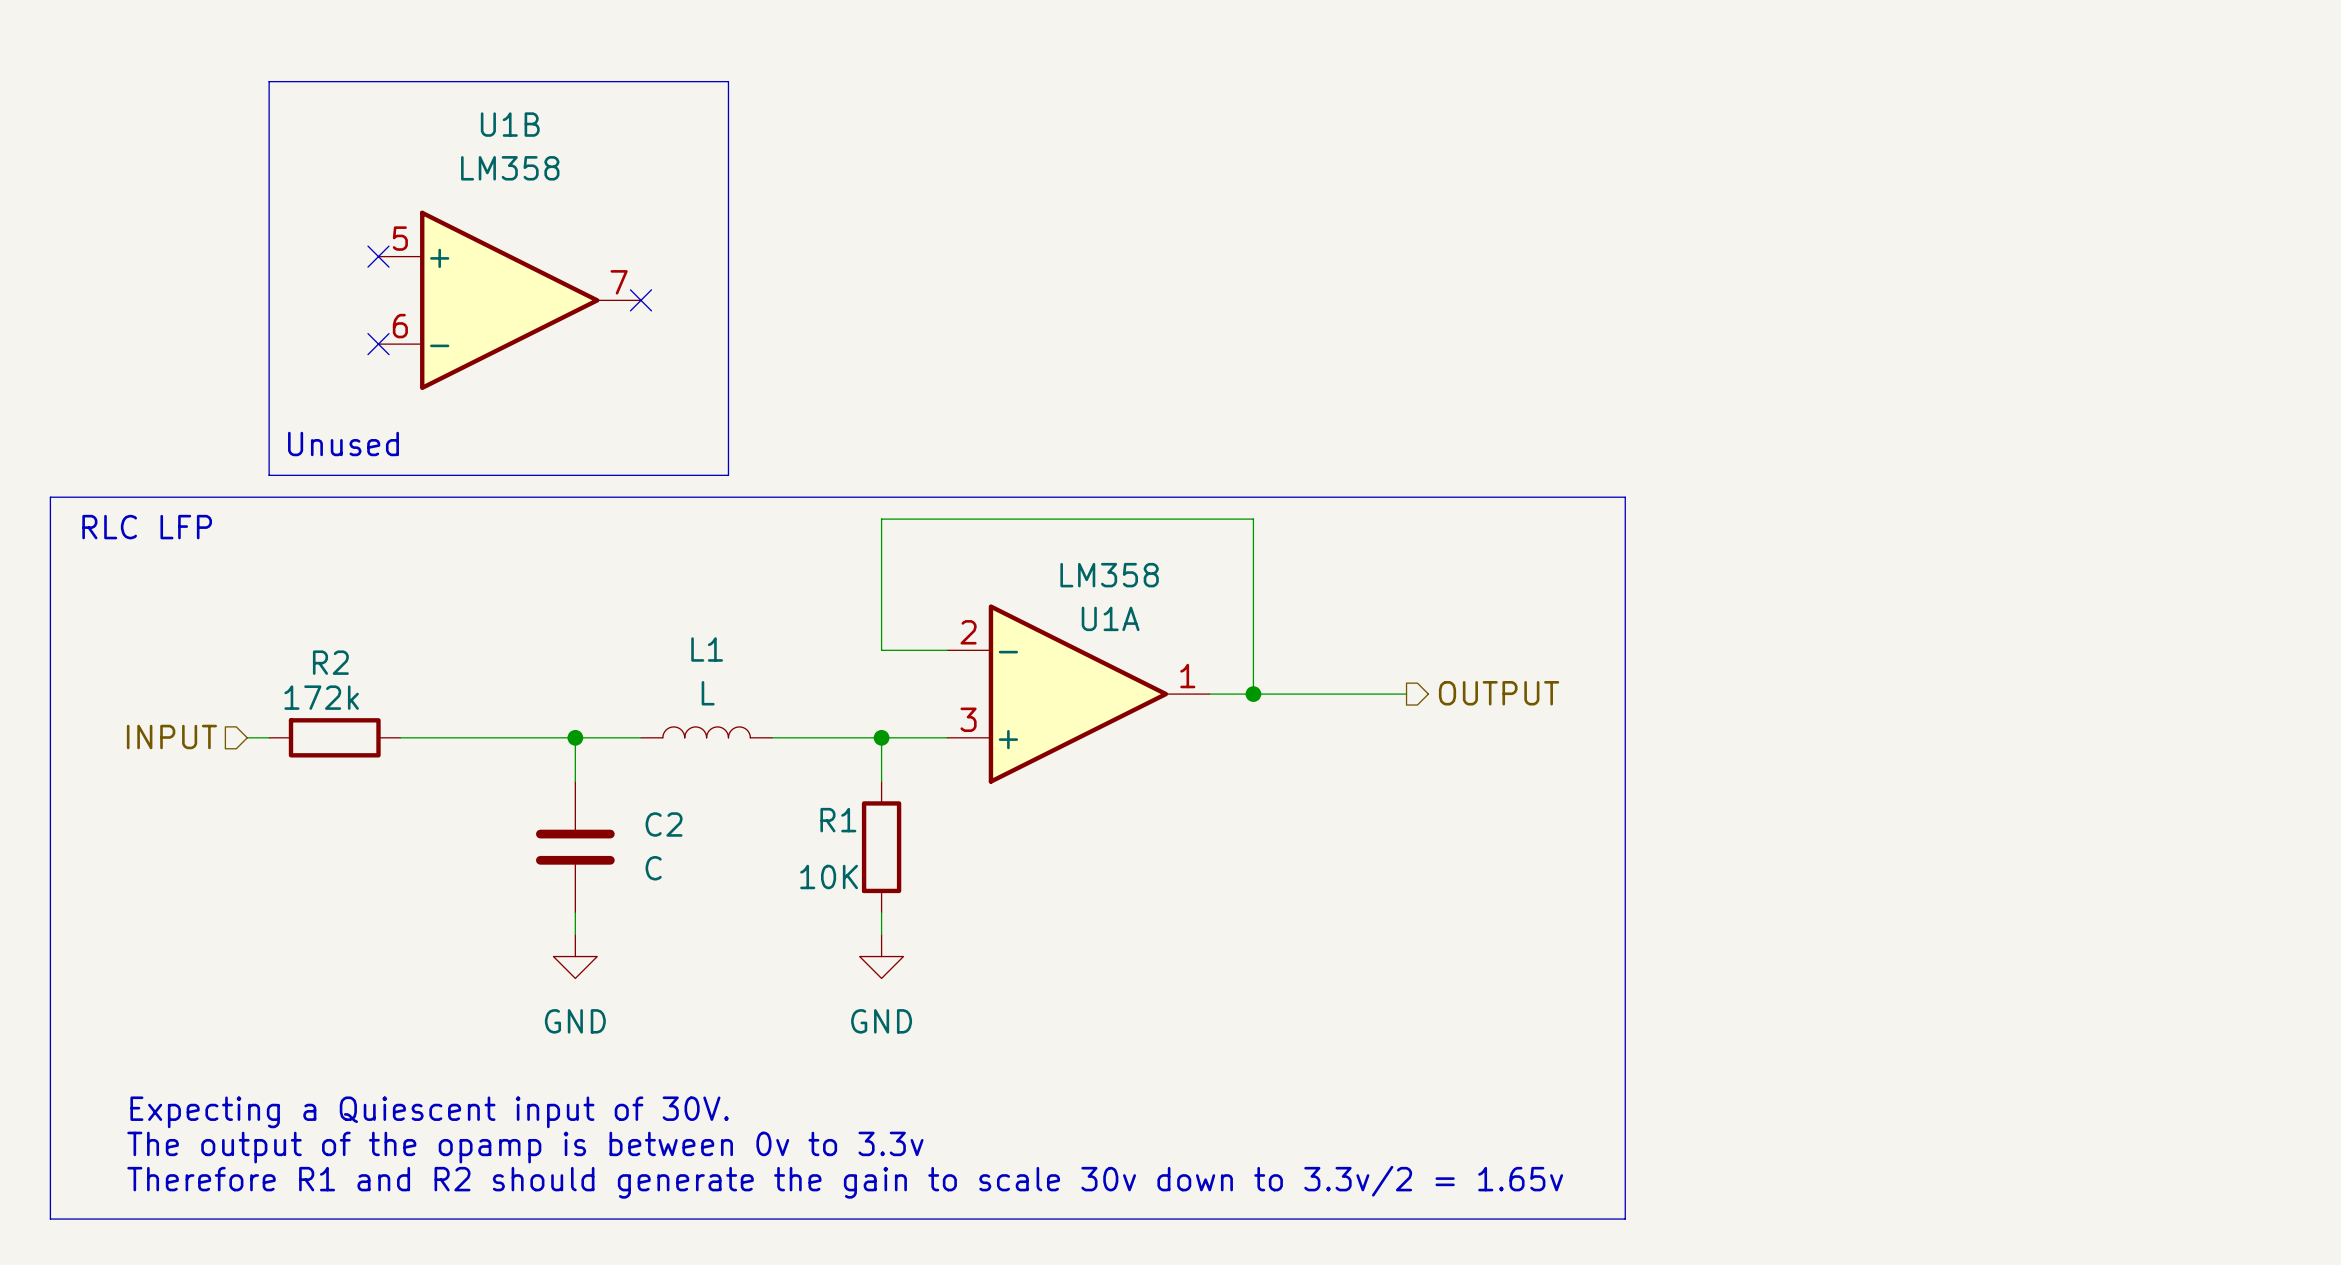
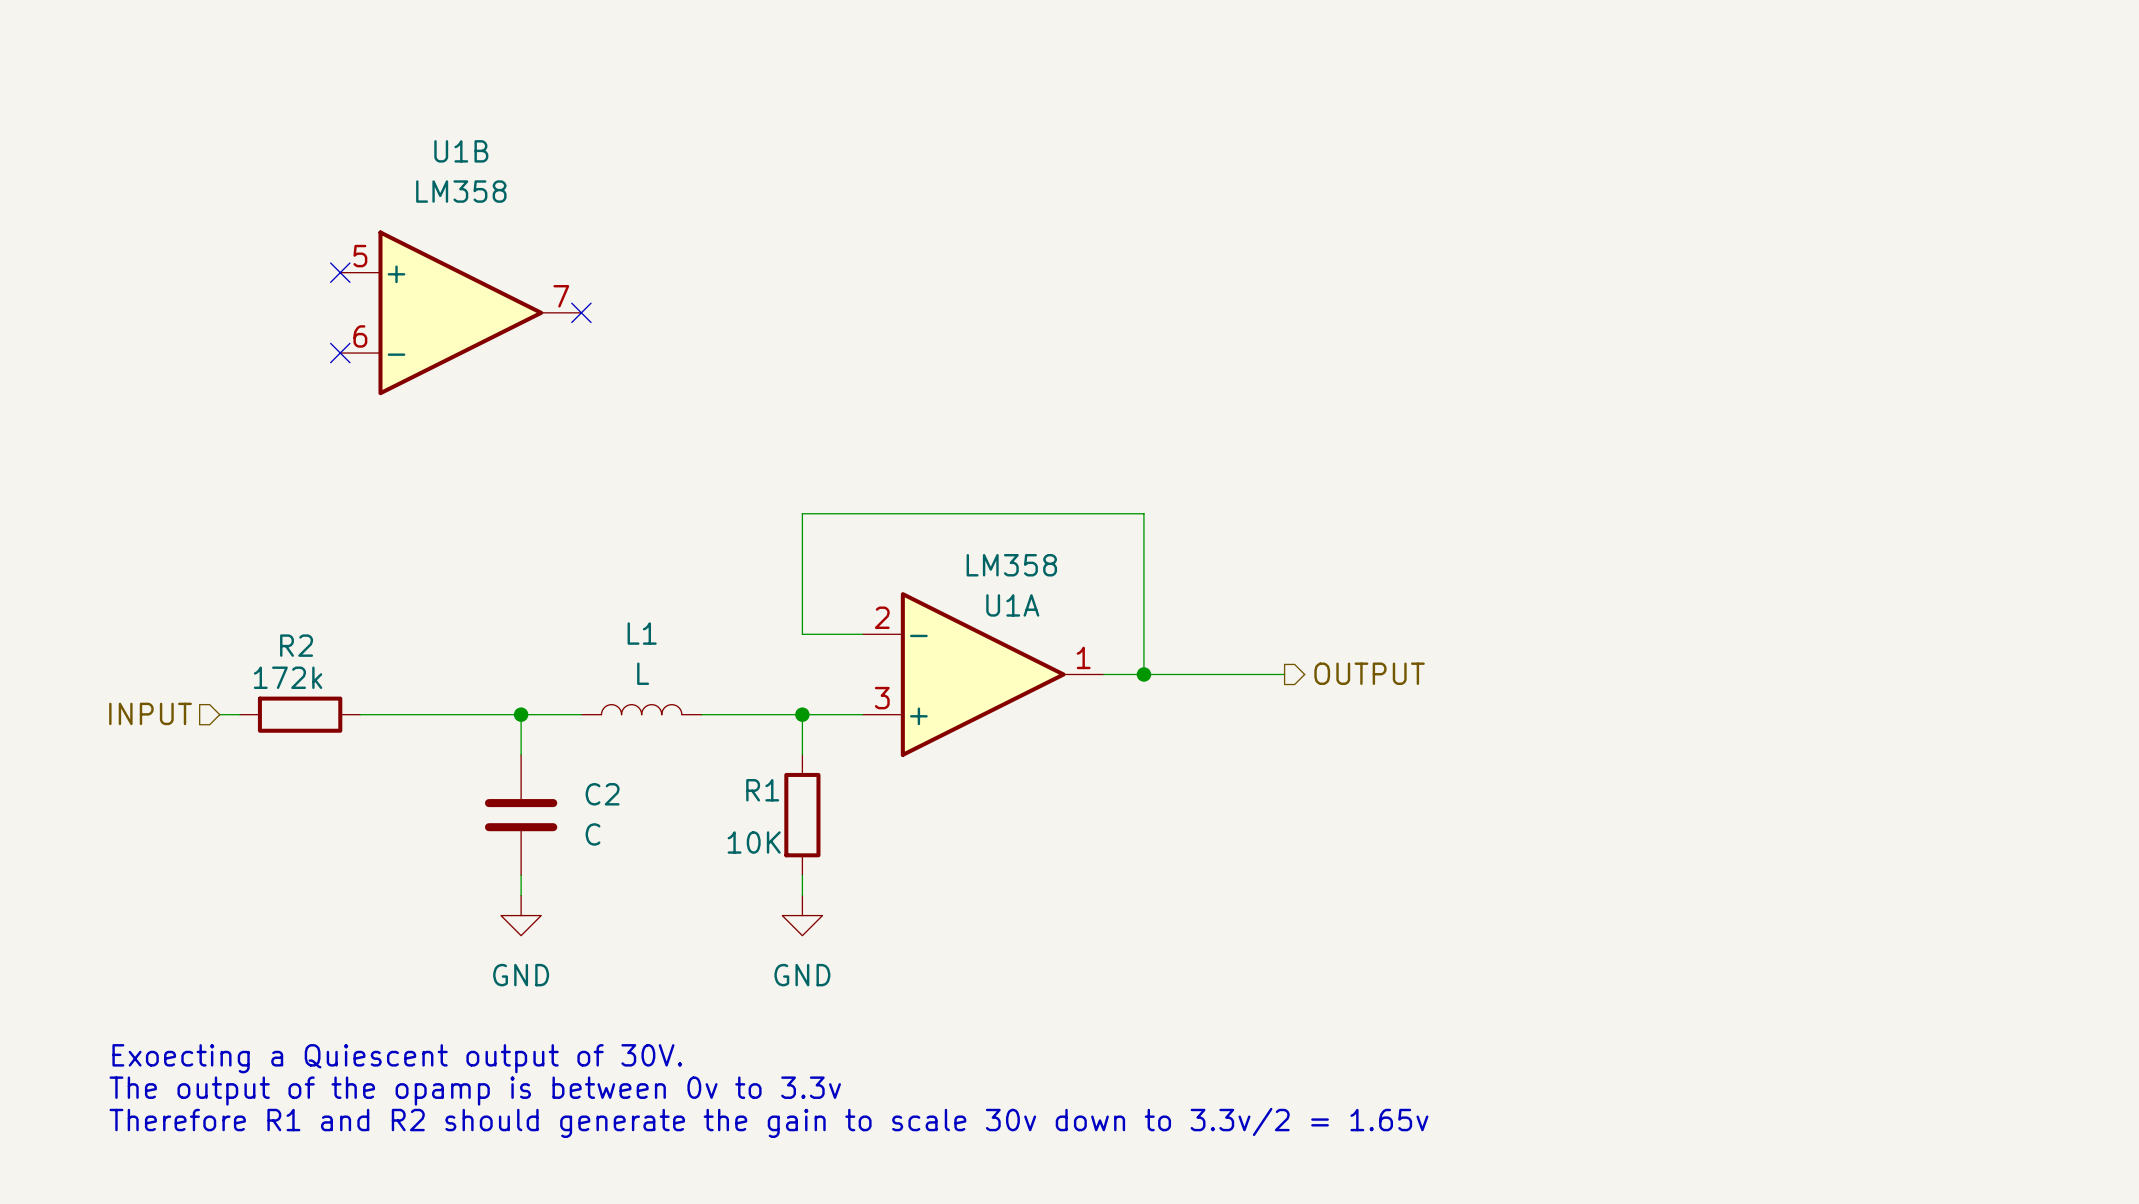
line: (269, 81) (728, 81) (728, 475) (269, 475) (269, 81) -> none
text: Unused (343, 443) -> none
line: (50, 497) (1625, 497) (1625, 1219) (50, 1219) (50, 497) -> none
text: RLC LFP (147, 527) -> none
text: Expecting a Quiescent input of 30V. (429, 1112) -> Exoecting a Quiescent output of 30V. (397, 1058)

